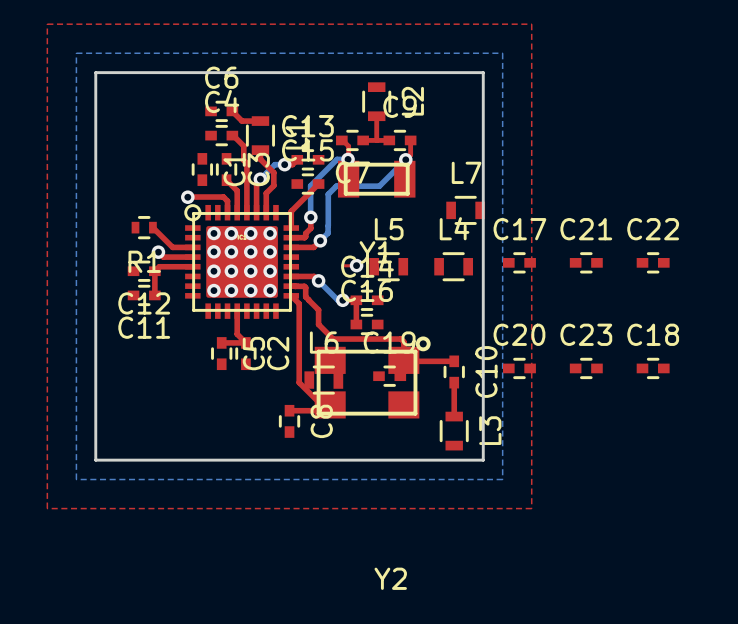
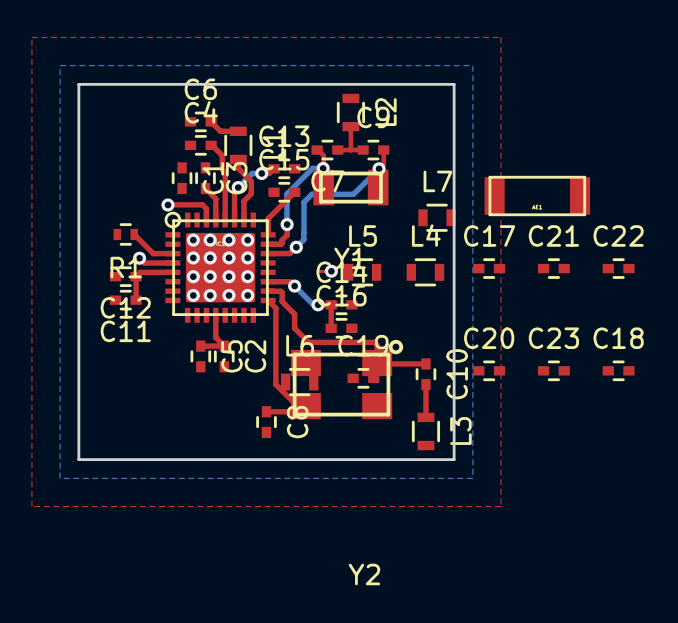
part: none -> (537, 196)

